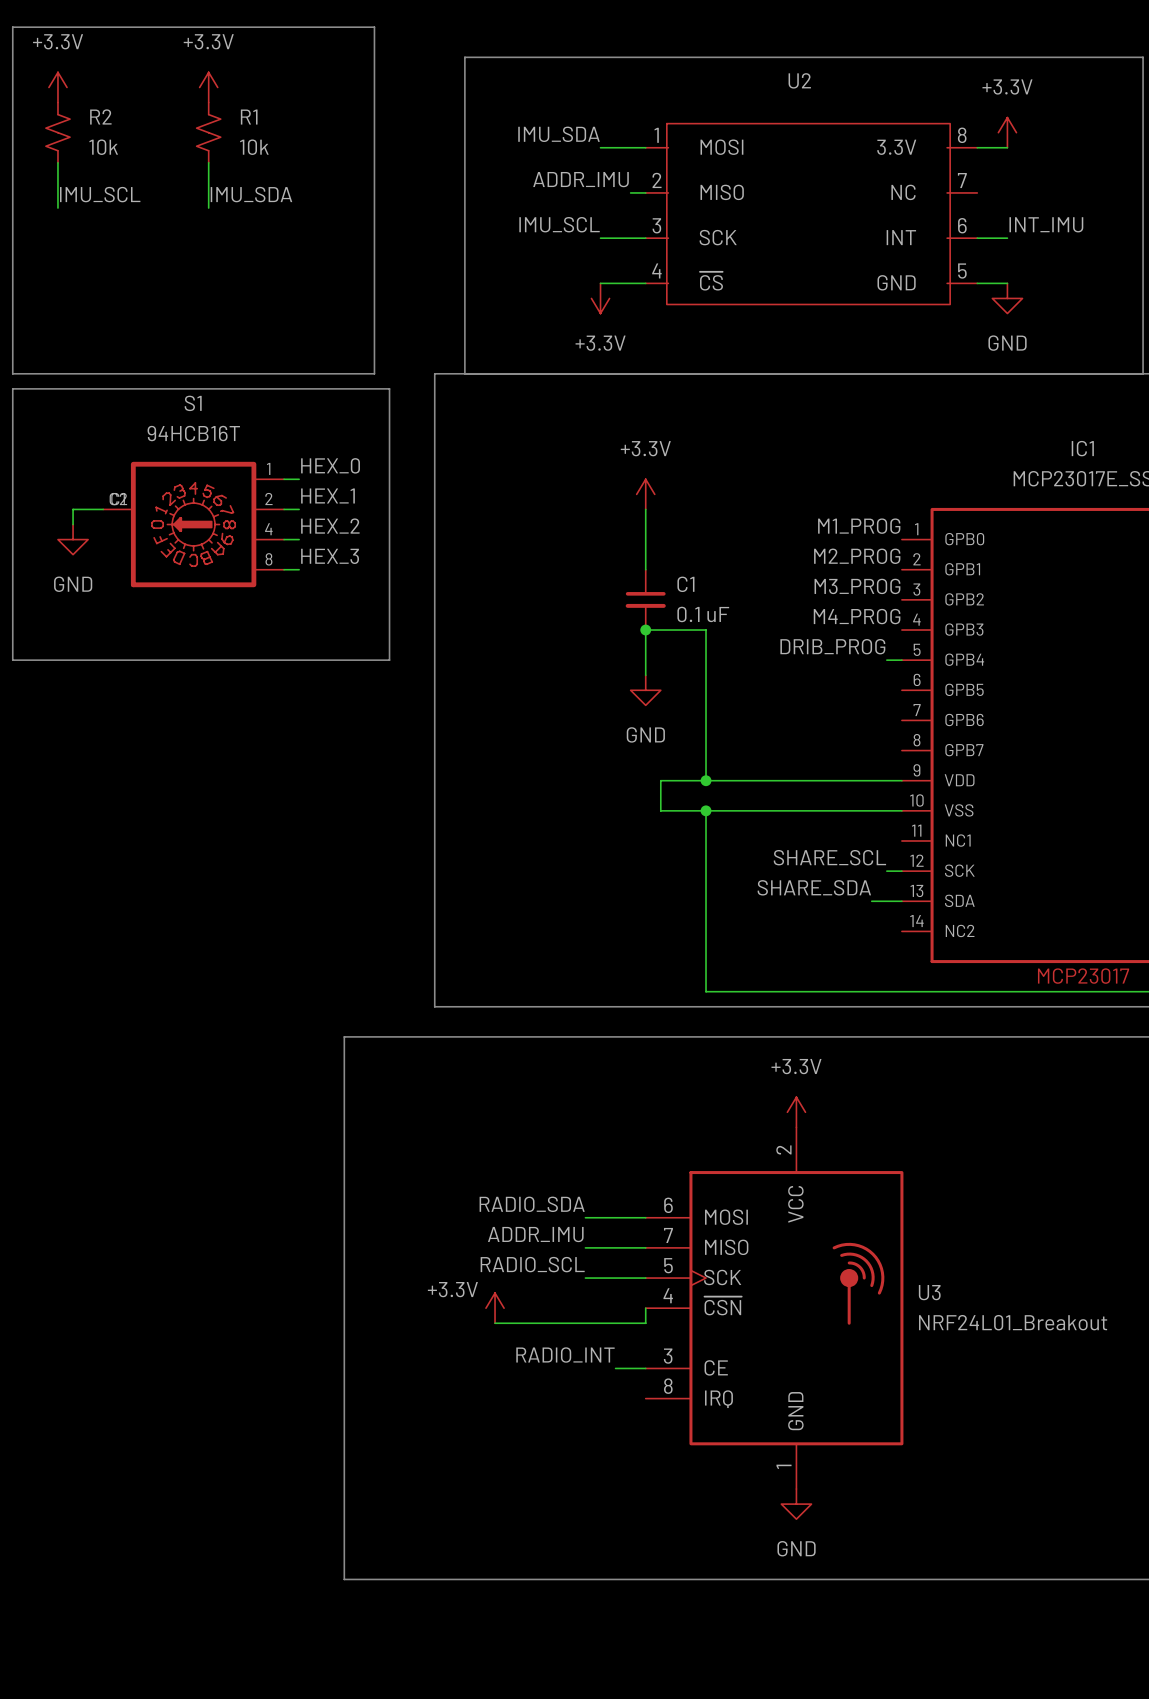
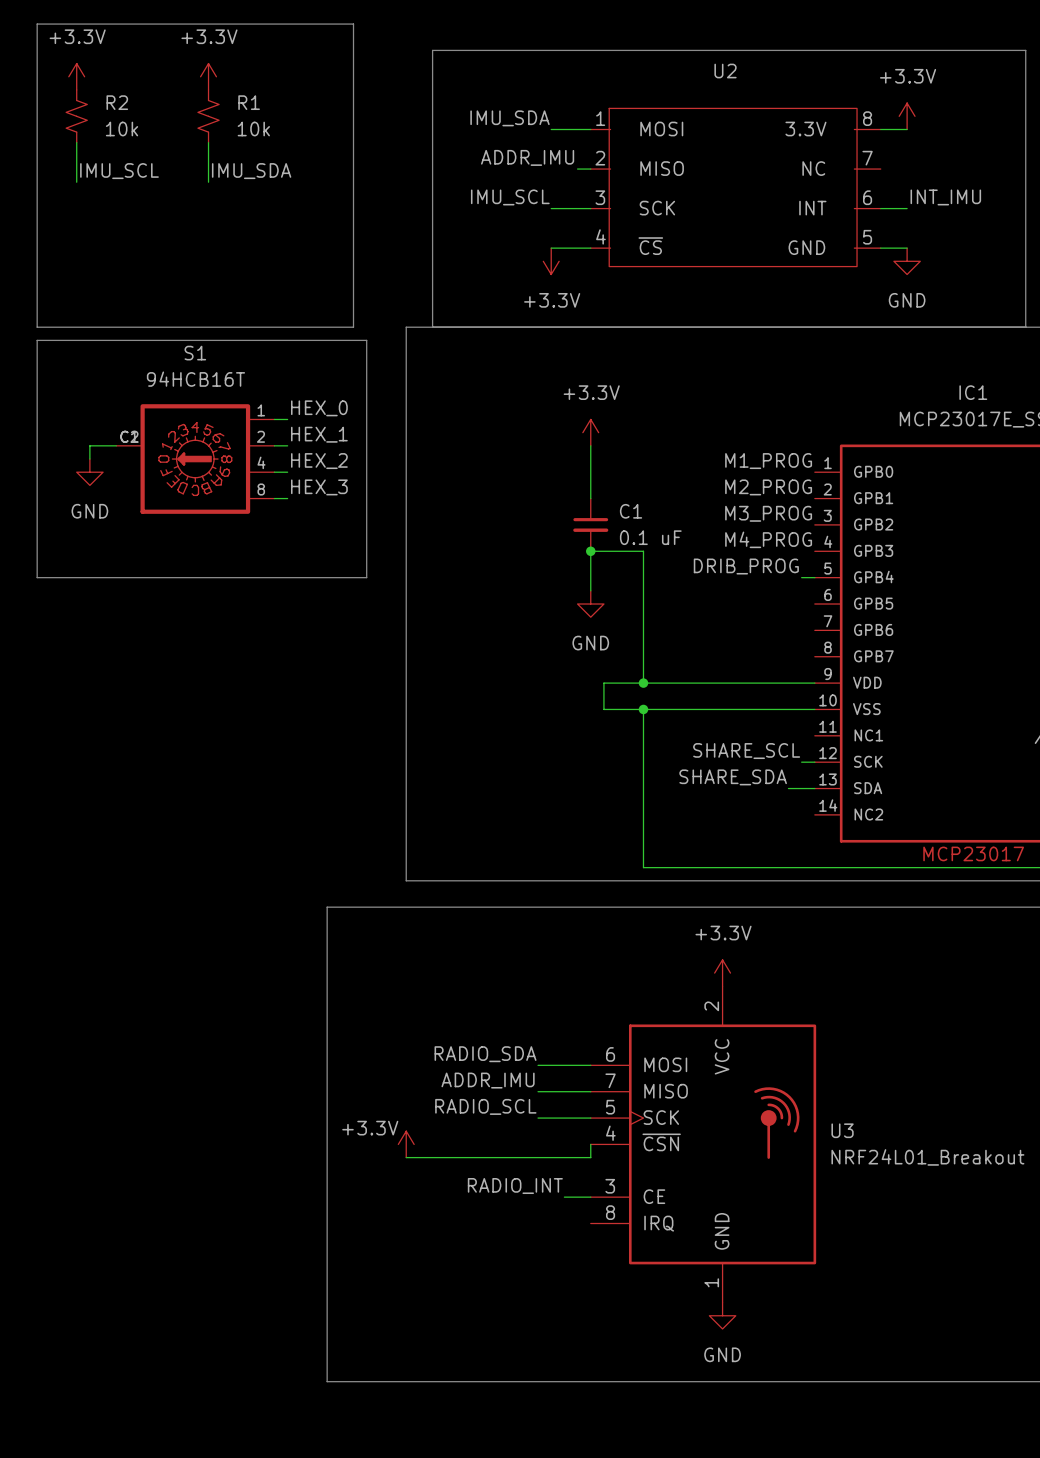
power symbol position: +3.3V (495, 1308) -> +3.3V (406, 1144)
wire: none -> (406, 1157) (458, 1157)

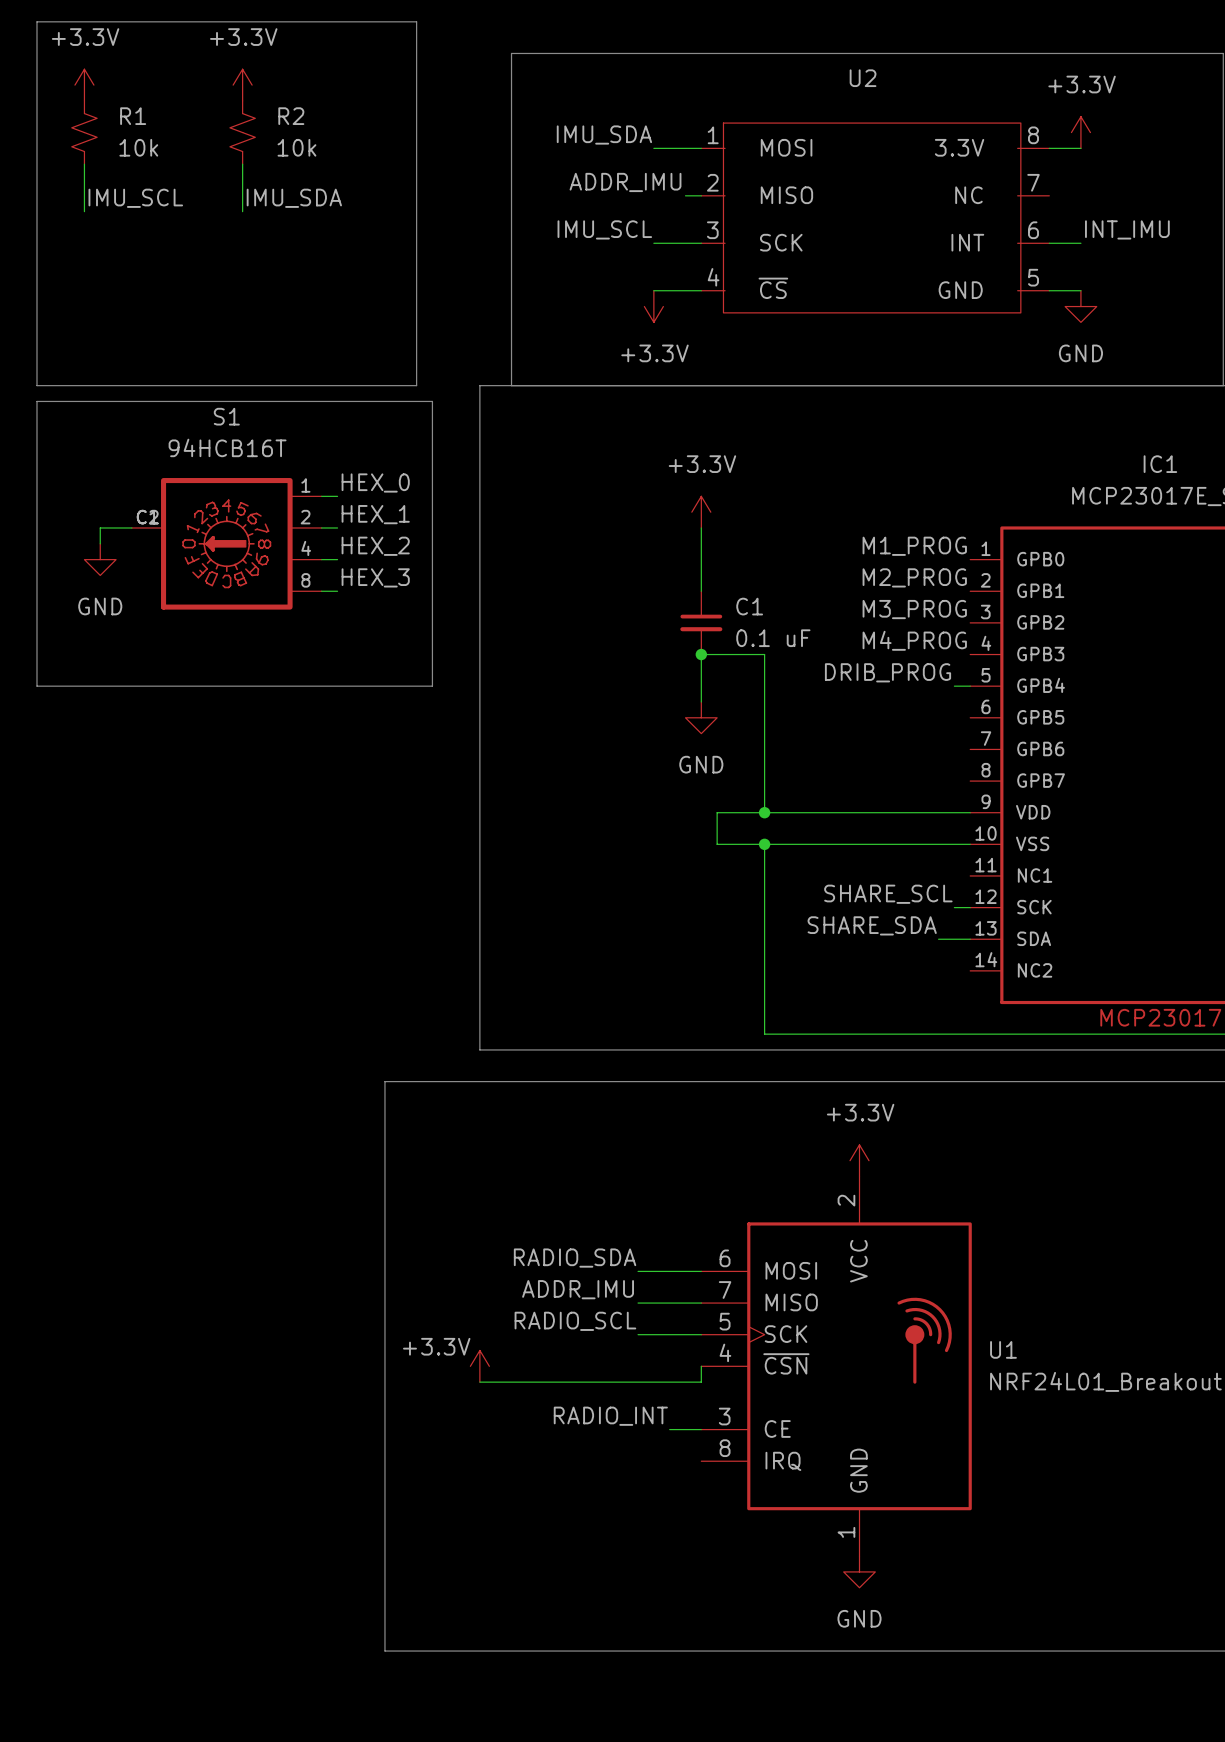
R2 name: R2 (117, 102) -> R1 (133, 116)
R1 name: R1 (249, 102) -> R2 (291, 116)
U3 name: U3 (842, 1130) -> U1 (1003, 1349)

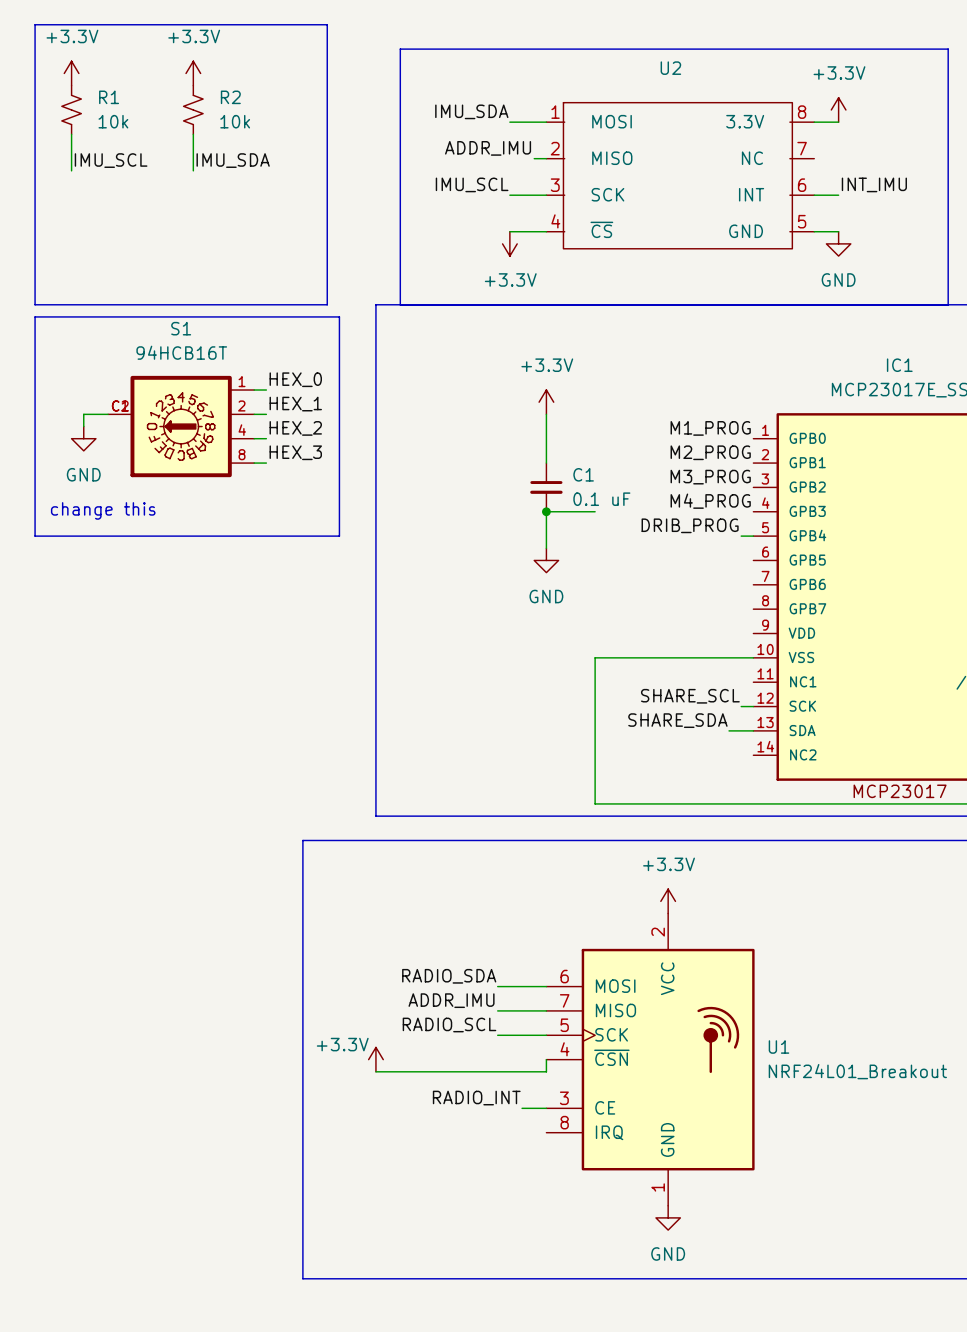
text: none -> change this (103, 510)
wire: (764, 654) (764, 812) -> none
junction: (764, 812) -> none
wire: (970, 812) (717, 812) (717, 844) (764, 844) -> none
junction: (764, 844) -> none

